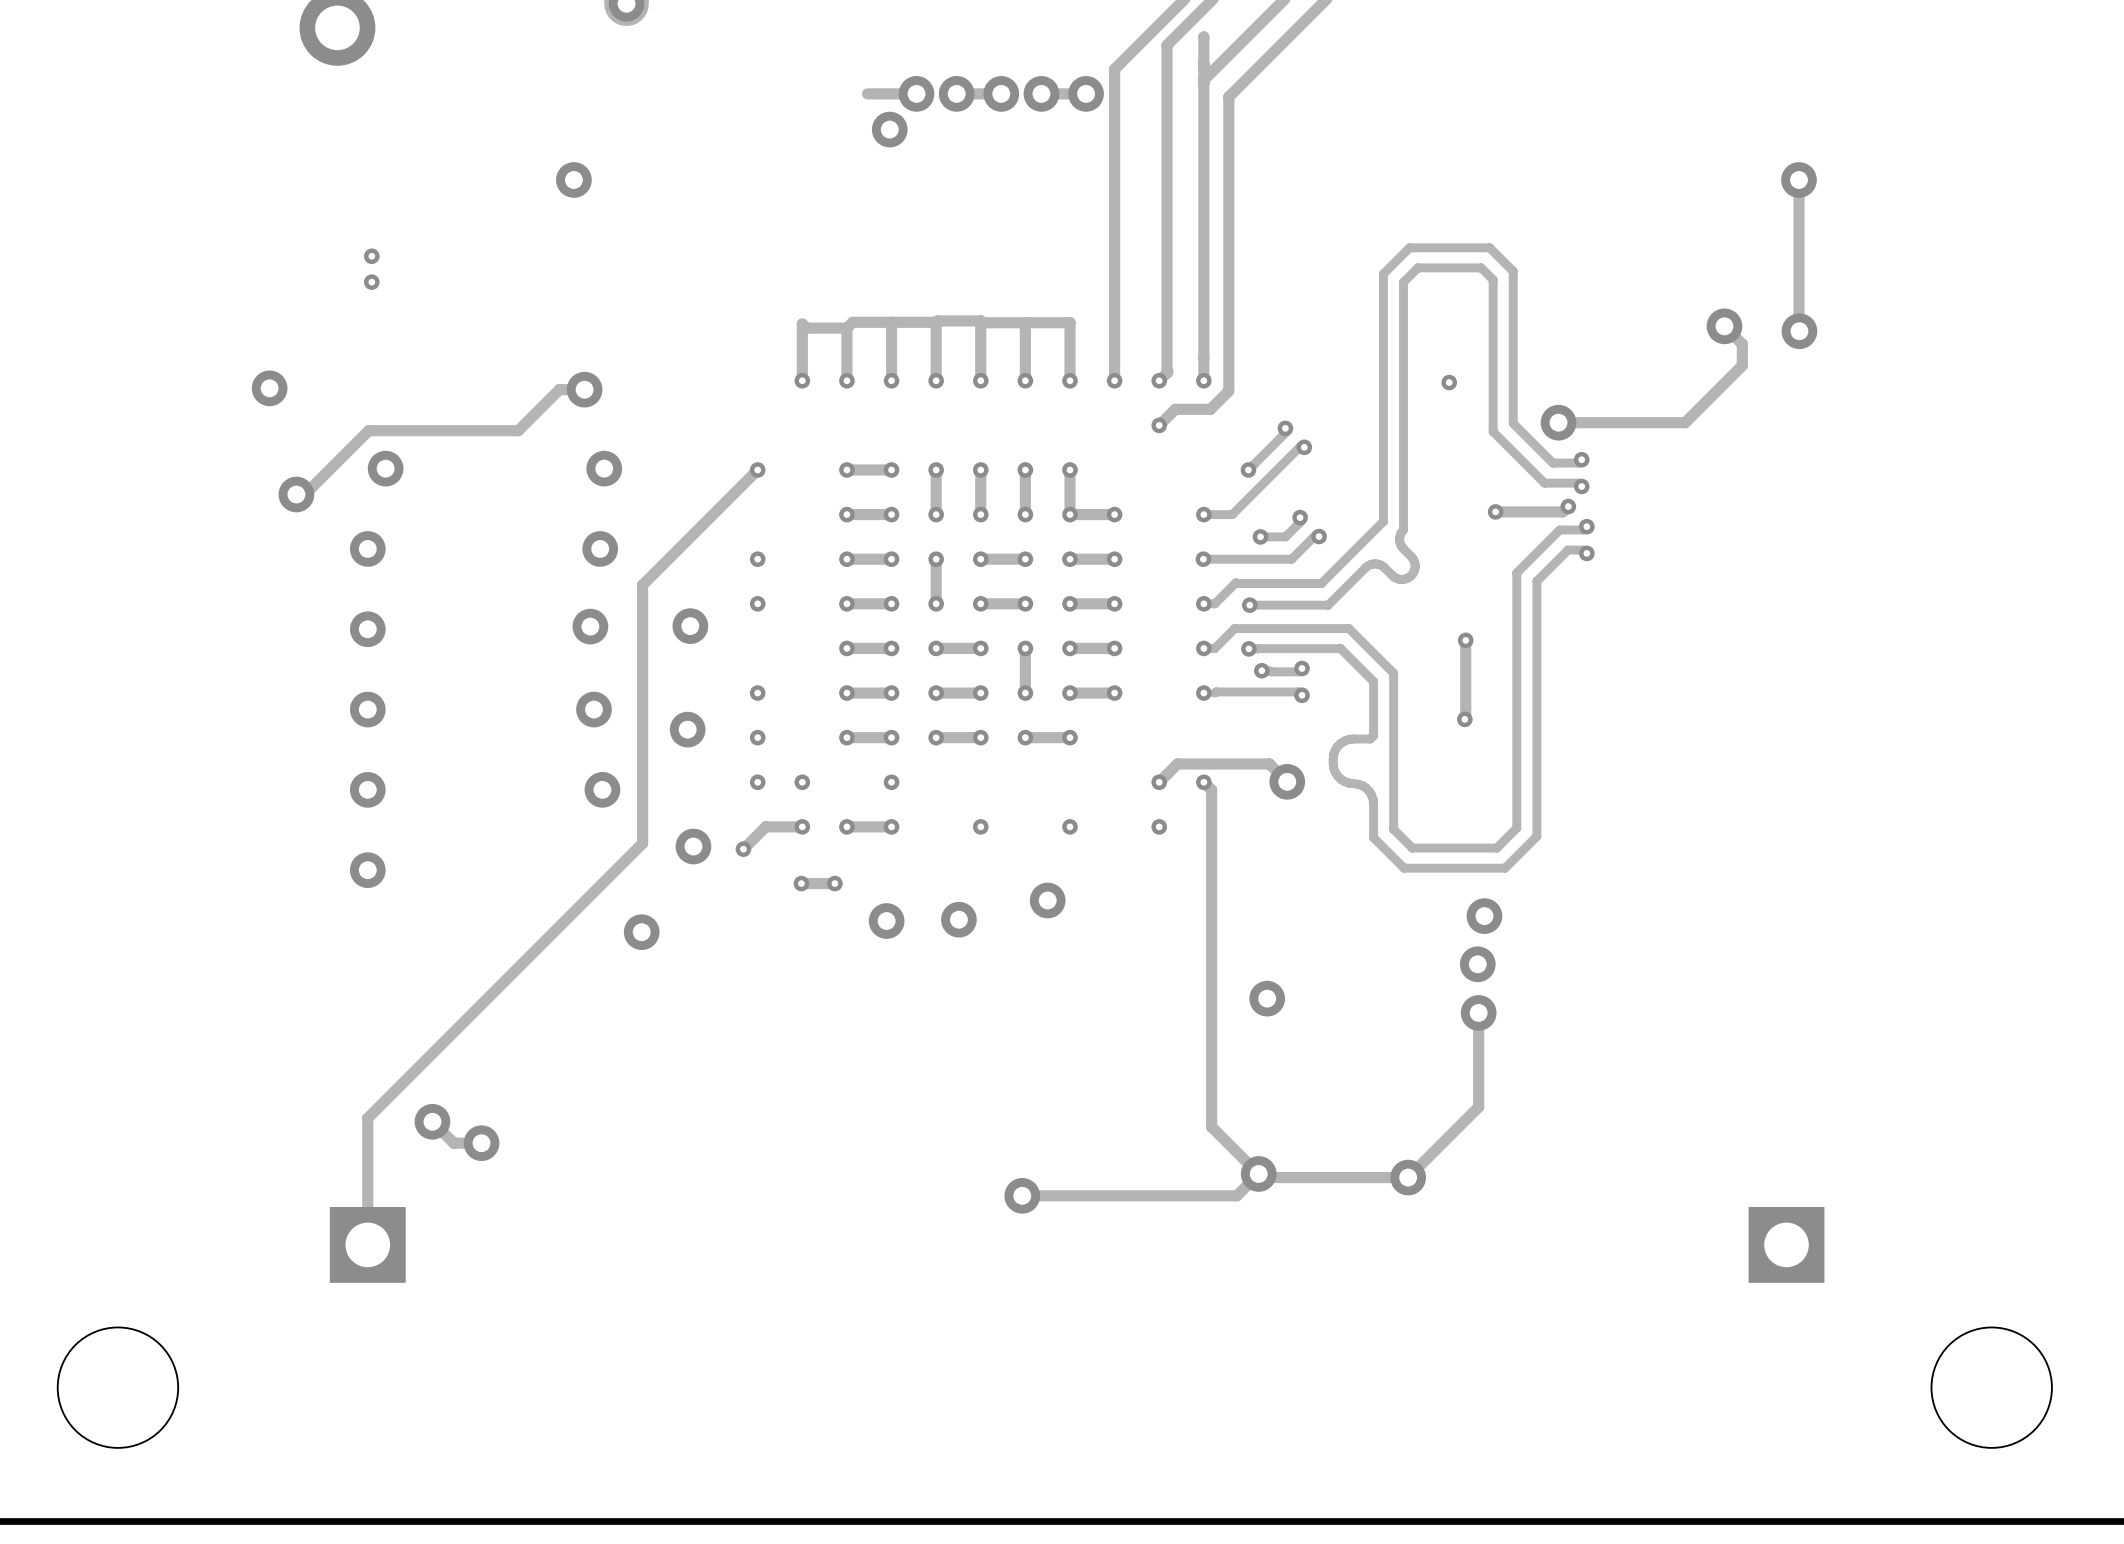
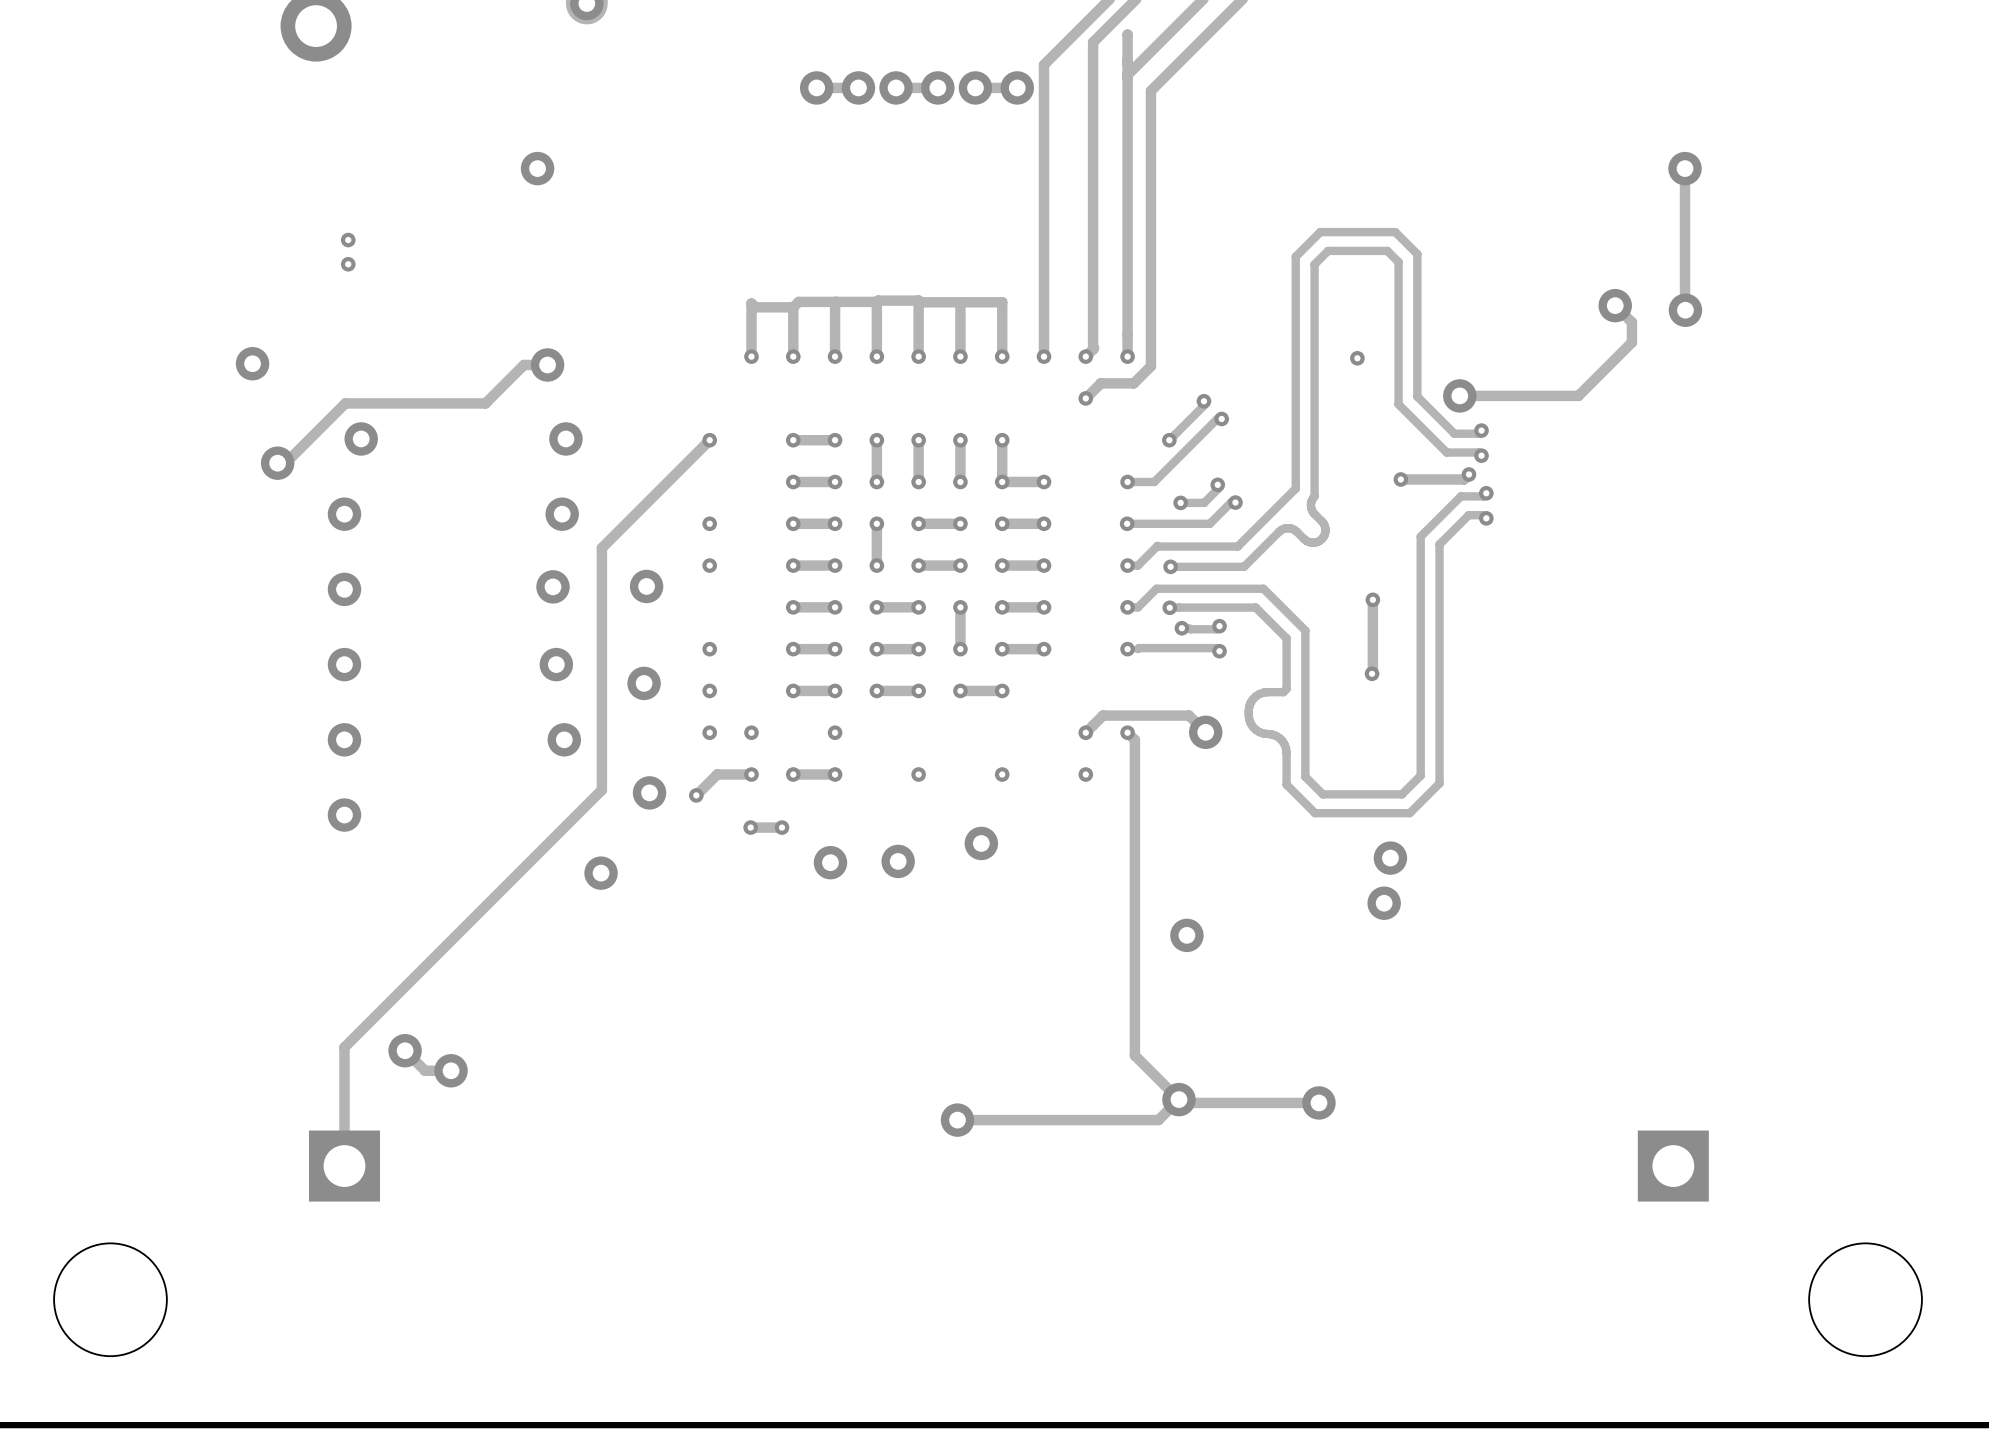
via position: (889, 129) -> (816, 87)
track: (1478, 1012) (1478, 1107) (1408, 1177) -> none
via: (1478, 1012) -> none

